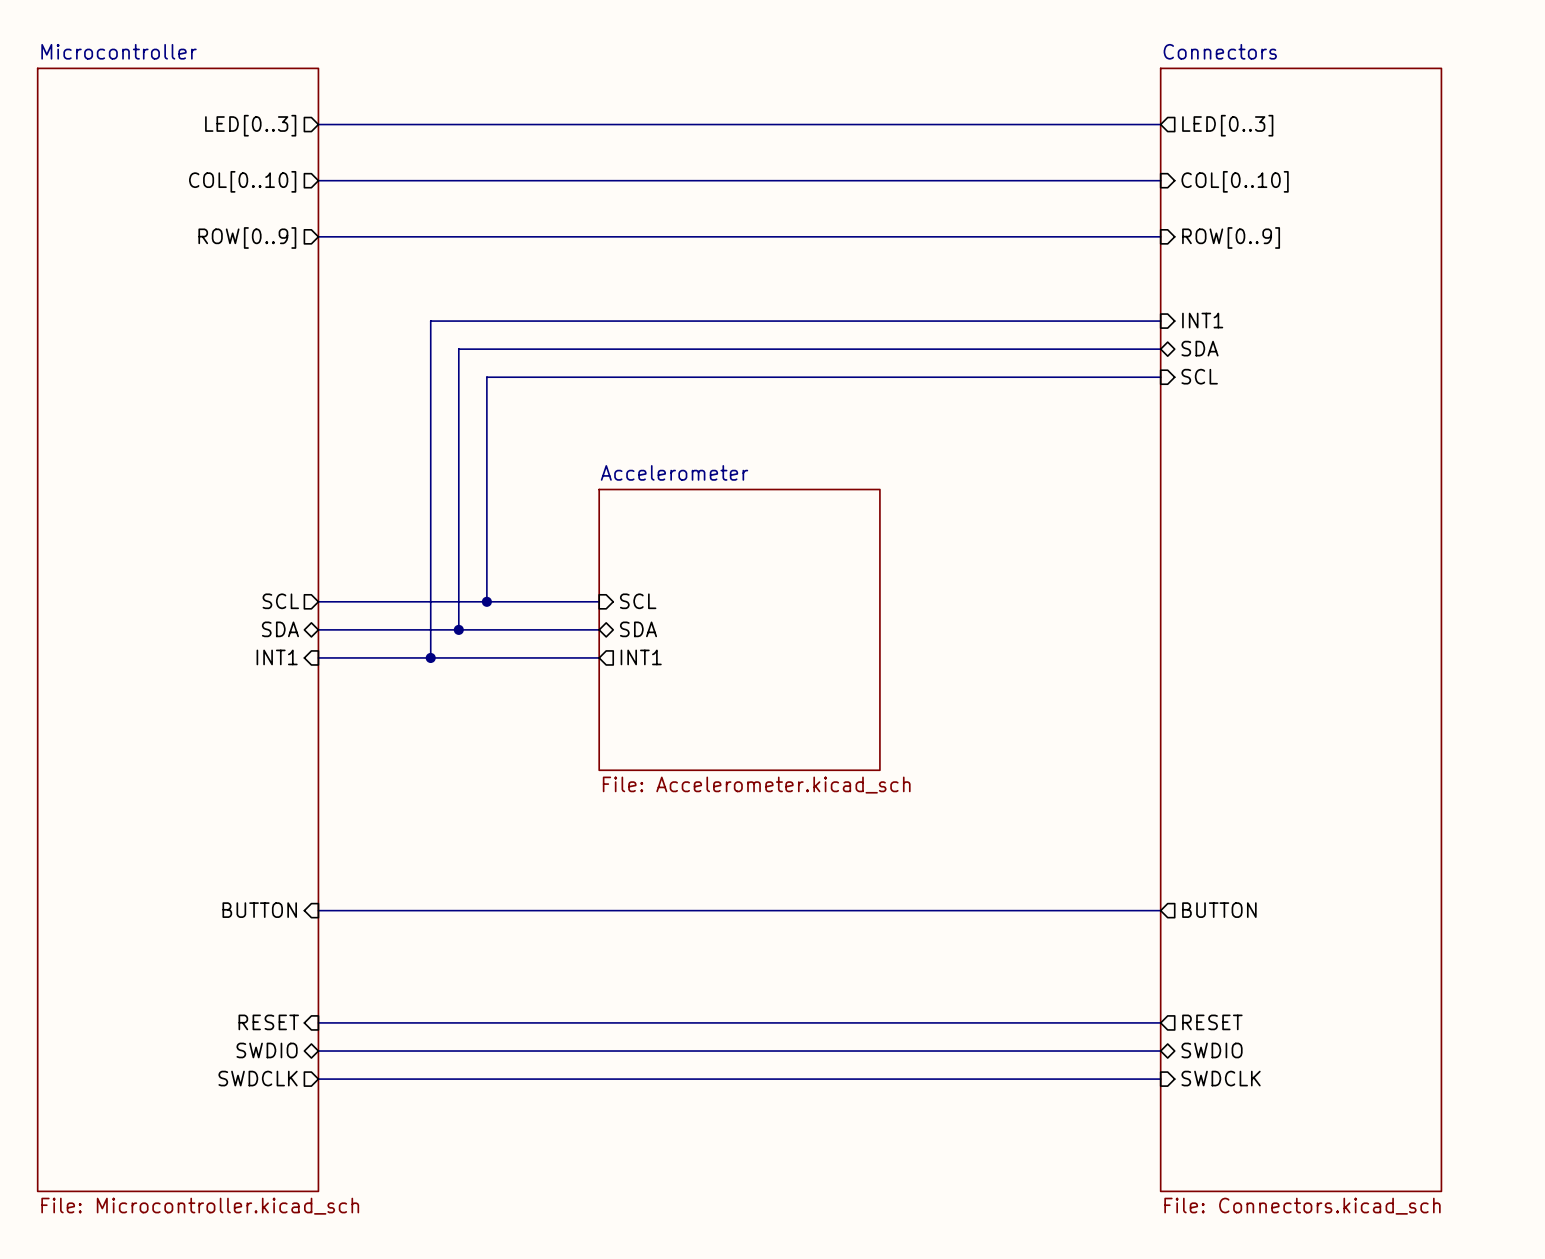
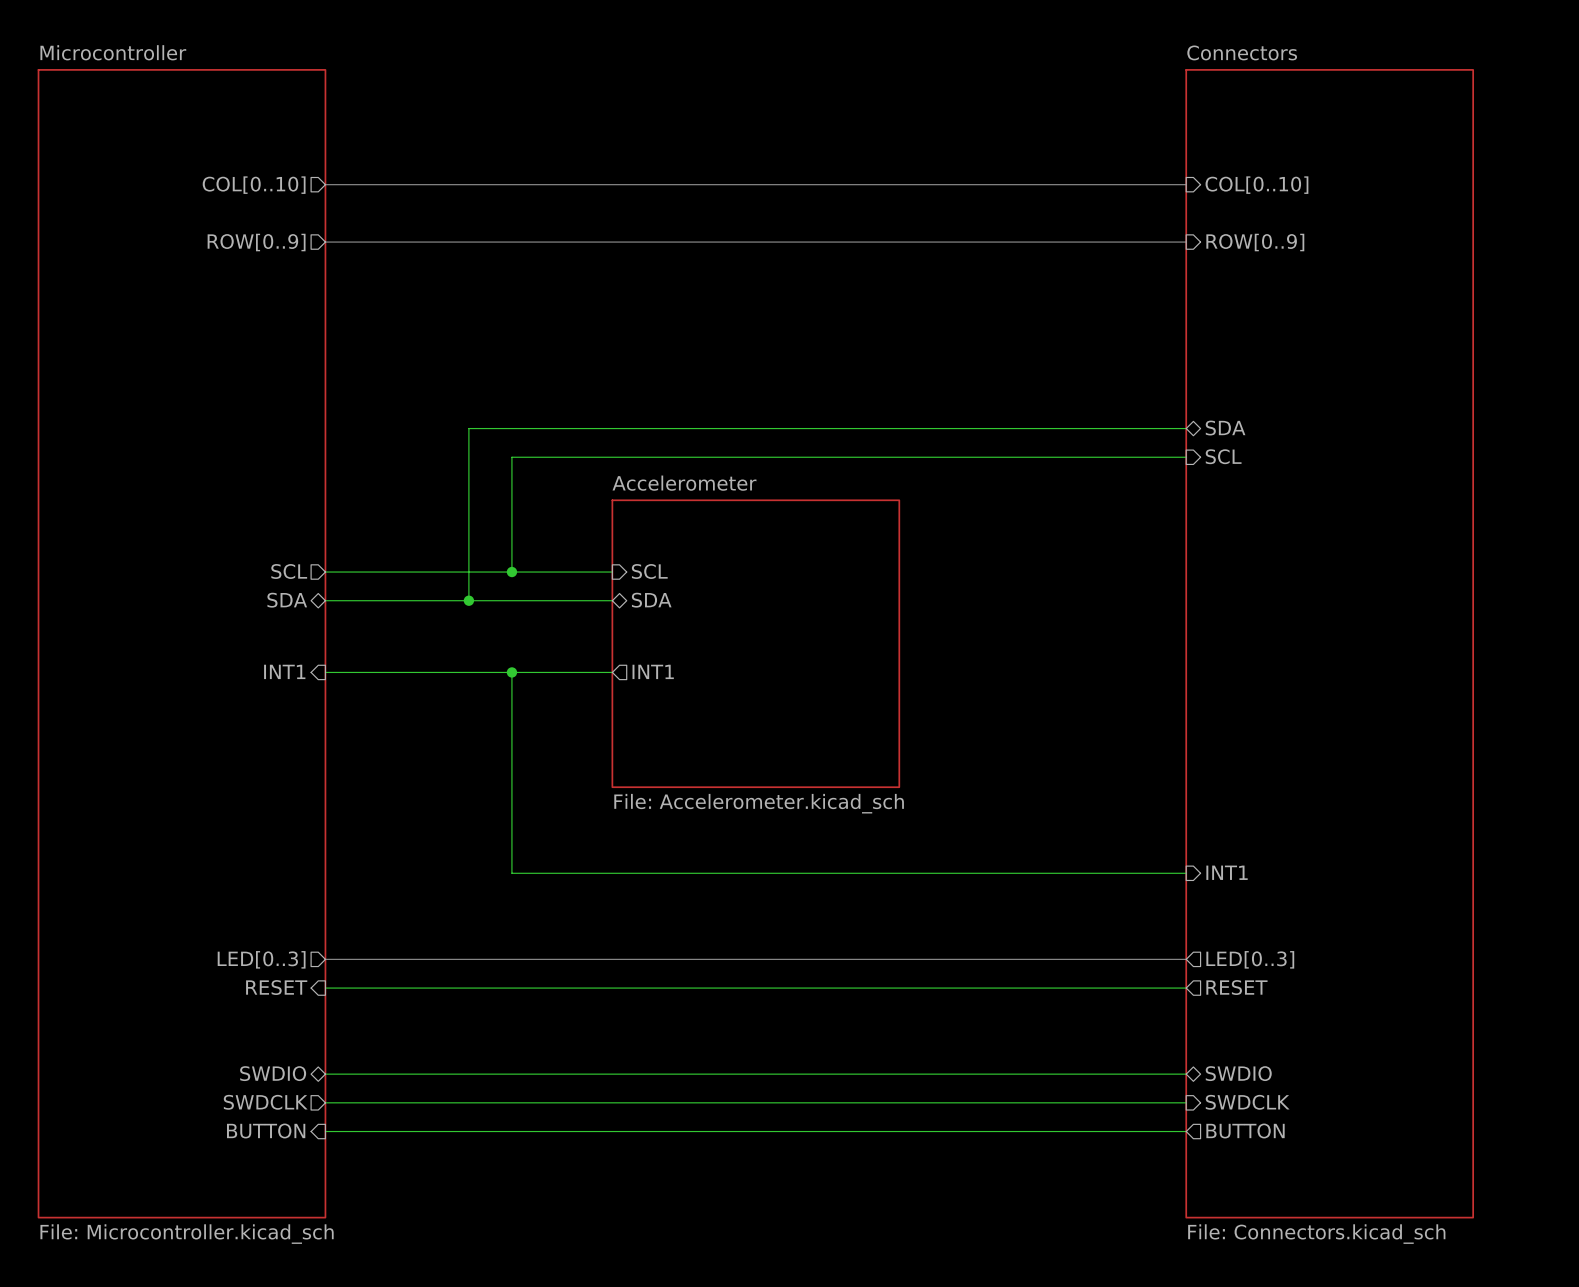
bus: (318, 124) (1160, 124) -> none
sheet pin: LED[0..3] (250, 125) -> none
sheet pin: LED[0..3] (1227, 125) -> none
sheet pin: INT1 (1202, 320) -> none
wire: (1160, 321) (430, 321) (430, 657) -> none
sheet pin position: SDA (1200, 348) -> SDA (1225, 428)
wire: (1160, 349) (458, 349) (458, 419) -> (1186, 428) (468, 428)
sheet pin position: SCL (1199, 376) -> SCL (1223, 456)
wire: (1160, 377) (486, 377) (486, 601) -> none
wire: none -> (1186, 457) (511, 457) (511, 572)
junction: none -> (511, 572)
wire: (458, 587) (458, 629) -> none
junction: none -> (468, 600)
sheet pin position: SCL (280, 601) -> SCL (289, 571)
wire: (318, 601) (599, 601) -> (325, 572) (612, 572)
junction: (486, 601) -> none
sheet pin position: SCL (638, 601) -> SCL (649, 571)
sheet pin position: SDA (280, 629) -> SDA (287, 600)
wire: (318, 629) (599, 629) -> (325, 600) (612, 600)
junction: (458, 629) -> none
sheet pin position: SDA (638, 629) -> SDA (651, 600)
junction: (430, 657) -> none
wire: none -> (511, 672) (511, 873) (1186, 873)
junction: none -> (511, 672)
sheet pin: none -> INT1 (1227, 872)
sheet pin position: BUTTON (259, 910) -> BUTTON (266, 1131)
wire: (318, 910) (1160, 910) -> (325, 1131) (1186, 1131)
sheet pin position: BUTTON (1219, 910) -> BUTTON (1245, 1131)
bus: none -> (325, 959) (1186, 959)
sheet pin: none -> LED[0..3] (261, 959)
sheet pin: none -> LED[0..3] (1250, 959)
sheet pin position: RESET (268, 1022) -> RESET (276, 987)
wire: (318, 1022) (1160, 1022) -> (325, 988) (1186, 988)
sheet pin position: RESET (1212, 1022) -> RESET (1236, 987)

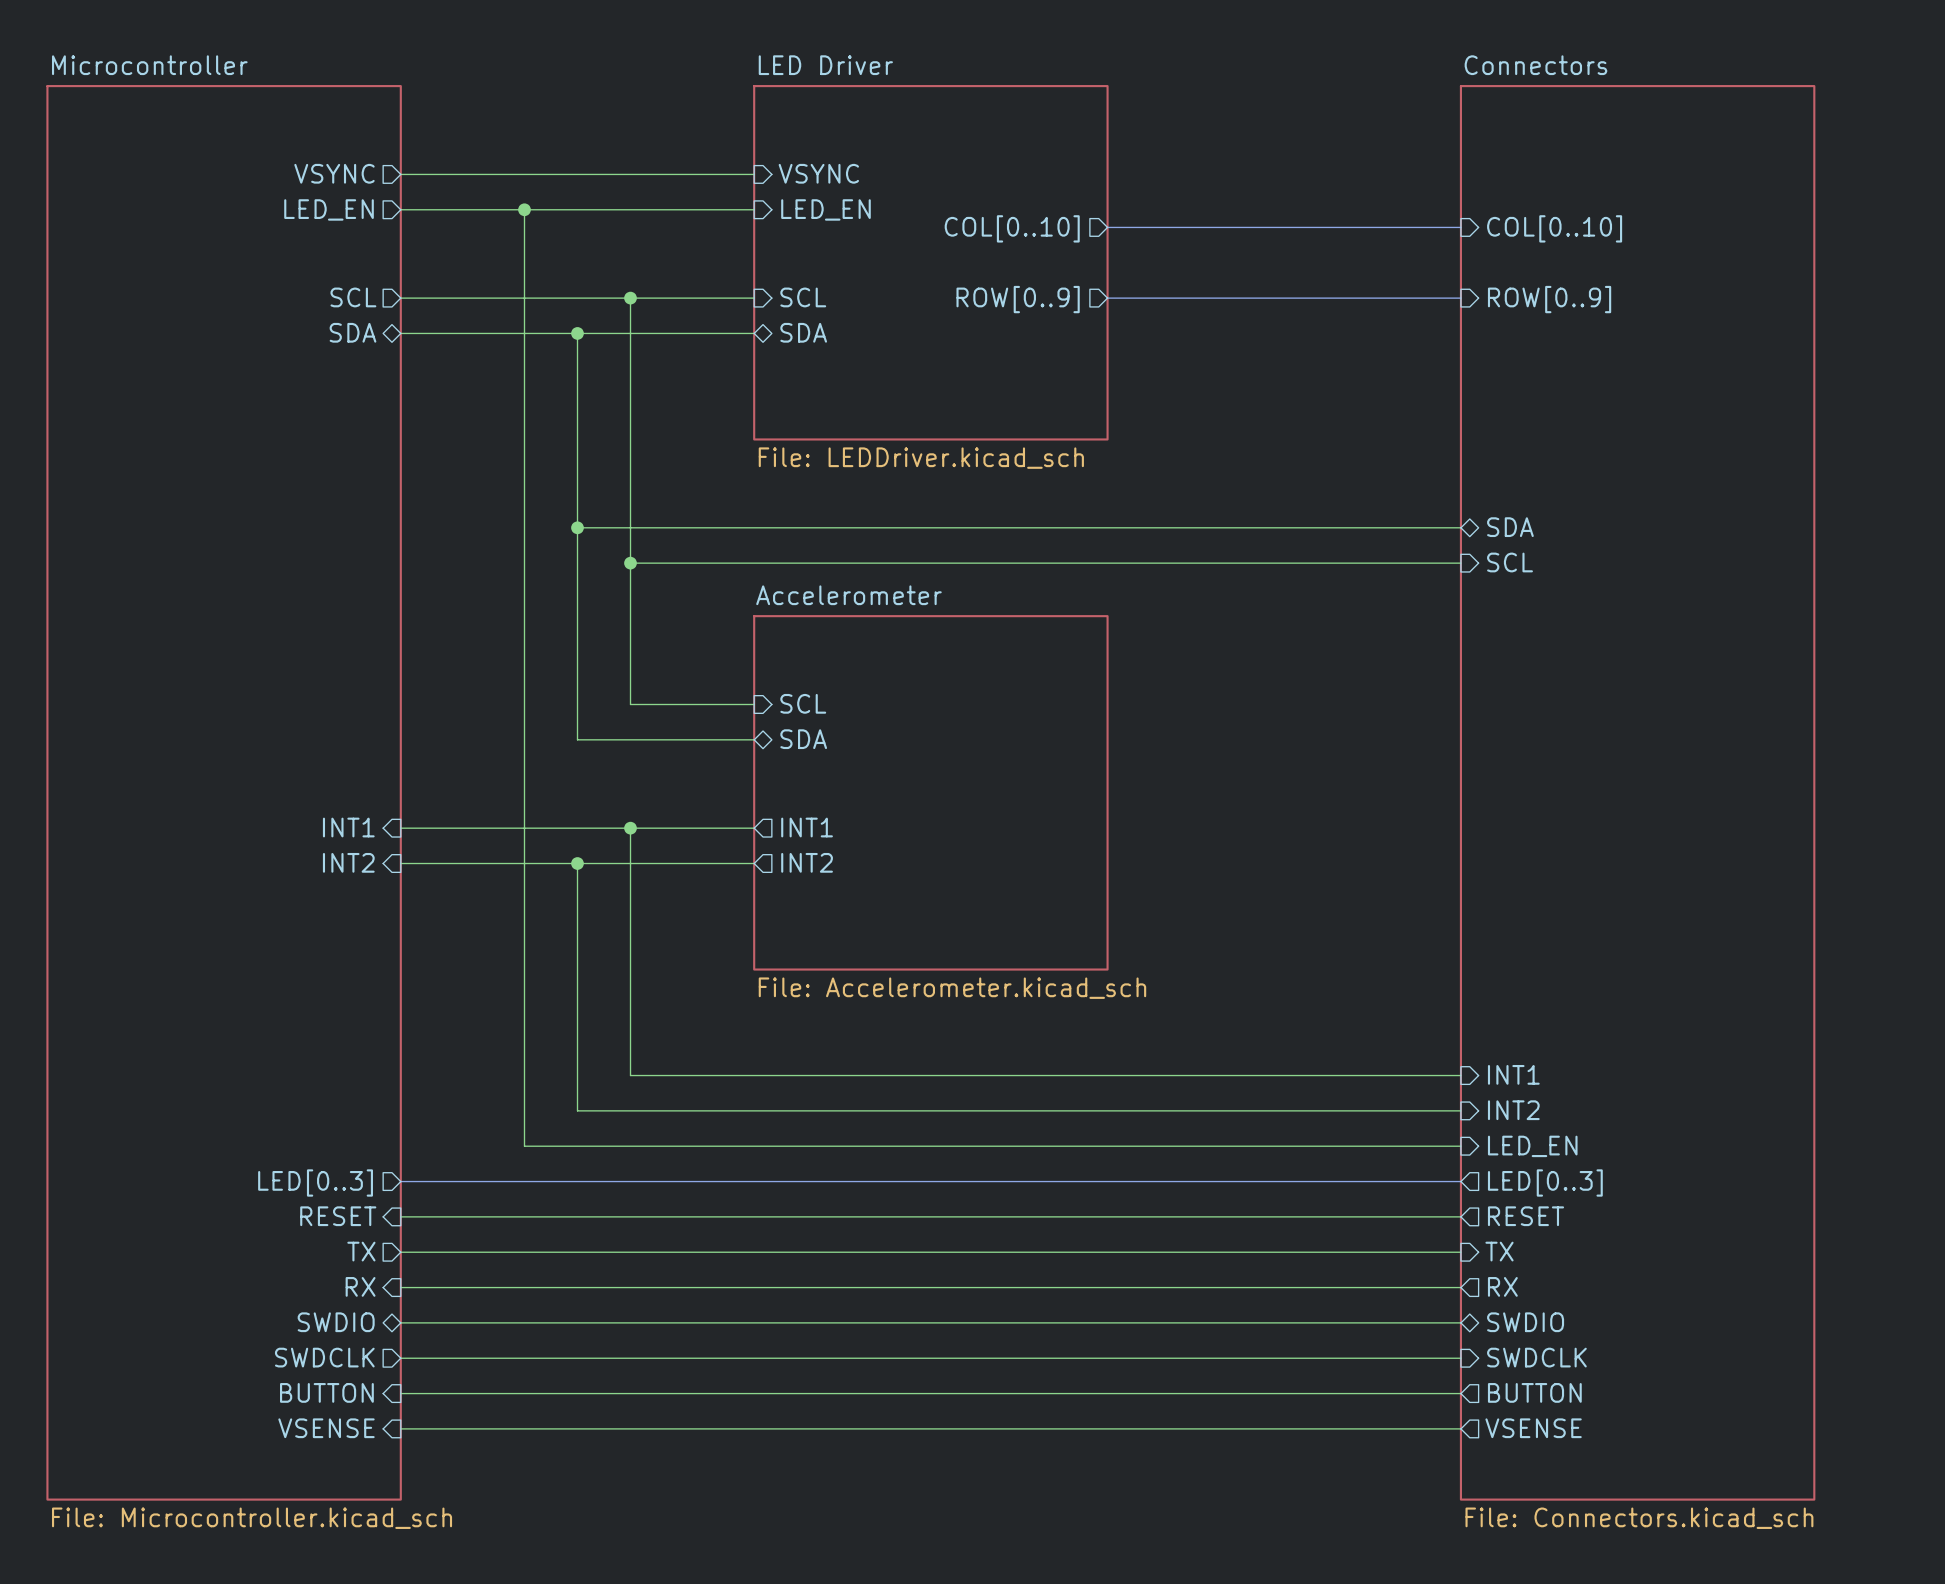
sheet pin: none -> VSYNC (334, 173)
wire: none -> (400, 174) (754, 174)
sheet pin: none -> VSYNC (818, 173)
wire: none -> (400, 209) (754, 209)
wire: none -> (524, 209) (524, 1146) (1460, 1146)
junction: none -> (524, 209)
sheet pin: none -> LED_EN (329, 209)
sheet pin: none -> LED_EN (825, 209)
bus: (325, 184) (899, 184) -> none
sheet pin: COL[0..10] (254, 185) -> none
sheet pin: none -> COL[0..10] (1012, 228)
sheet LED Driver: none -> File: LEDDriver.kicad_sch (930, 262)
sheet pin: none -> SCL (803, 297)
sheet pin: ROW[0..9] (256, 242) -> SCL (353, 297)
bus: (325, 242) (899, 242) -> none
wire: none -> (630, 298) (630, 563)
junction: none -> (630, 298)
sheet pin: none -> ROW[0..9] (1018, 299)
sheet pin: none -> SDA (353, 332)
wire: none -> (400, 333) (754, 333)
wire: none -> (577, 333) (577, 527)
junction: none -> (577, 333)
sheet pin: none -> SDA (803, 332)
junction: none -> (577, 527)
junction: none -> (630, 563)
sheet pin: SCL (289, 571) -> none
wire: (325, 572) (511, 572) -> none
junction: (511, 572) -> none
sheet pin: SDA (287, 600) -> none
wire: (325, 600) (468, 600) -> none
junction: (468, 600) -> none
sheet pin: none -> INT2 (348, 862)
sheet pin: none -> INT2 (807, 862)
wire: none -> (400, 863) (754, 863)
wire: none -> (577, 863) (577, 1110) (1460, 1110)
junction: none -> (577, 863)
sheet pin: none -> INT2 (1513, 1110)
sheet pin: none -> LED_EN (1532, 1146)
sheet pin: none -> TX (361, 1251)
wire: none -> (400, 1252) (1460, 1252)
sheet pin: none -> TX (1499, 1251)
sheet pin: none -> RX (360, 1286)
sheet pin: none -> RX (1502, 1286)
wire: none -> (400, 1287) (1460, 1287)
sheet pin: none -> VSENSE (326, 1428)
sheet pin: none -> VSENSE (1533, 1428)
wire: none -> (400, 1428) (1460, 1428)

